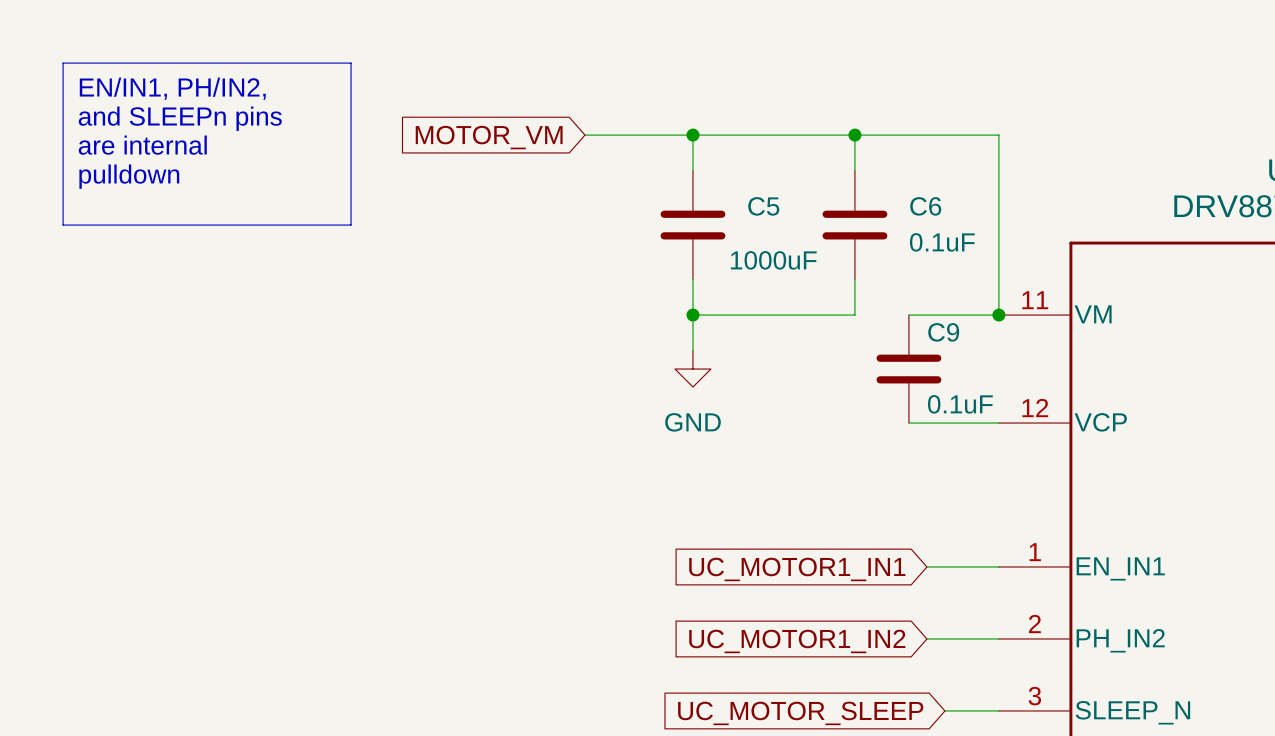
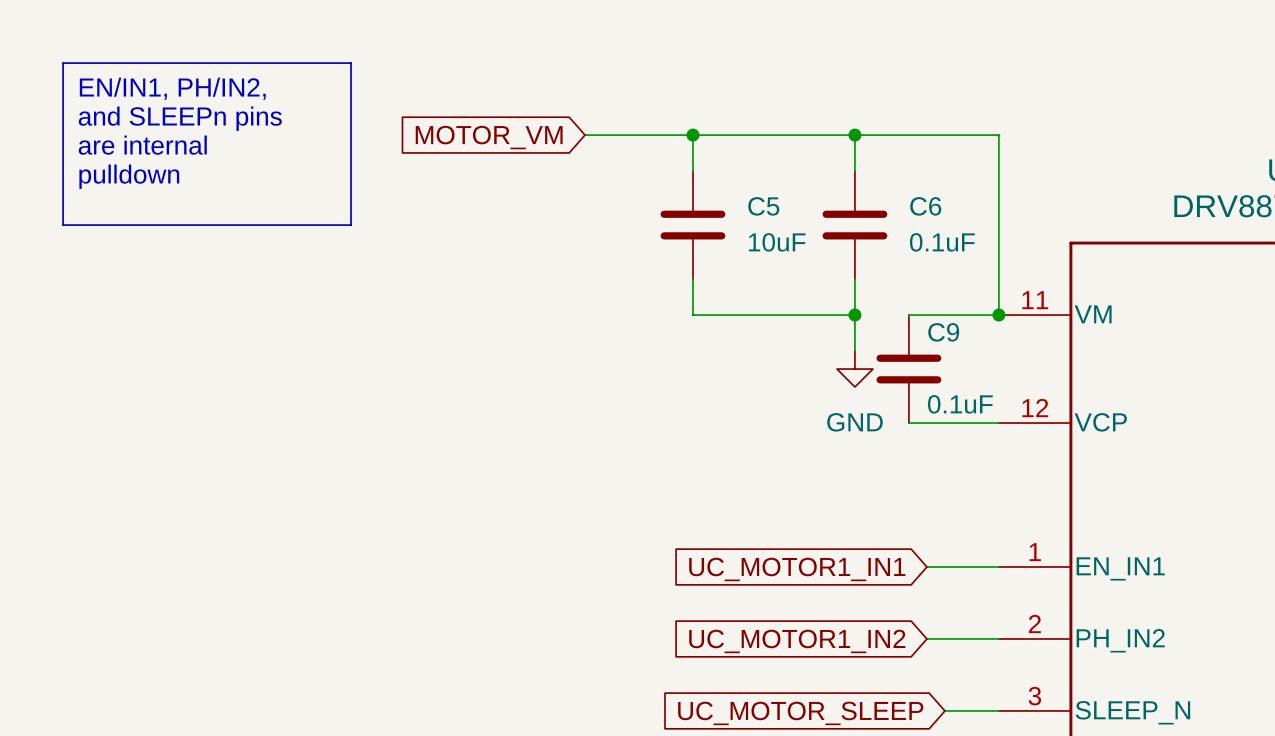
C5 value: 1000uF (773, 260) -> 10uF (777, 242)
wire: (692, 315) (692, 351) -> (854, 315) (854, 351)
junction: (692, 315) -> none
junction: none -> (854, 315)
power symbol position: GND (692, 369) -> GND (854, 369)

